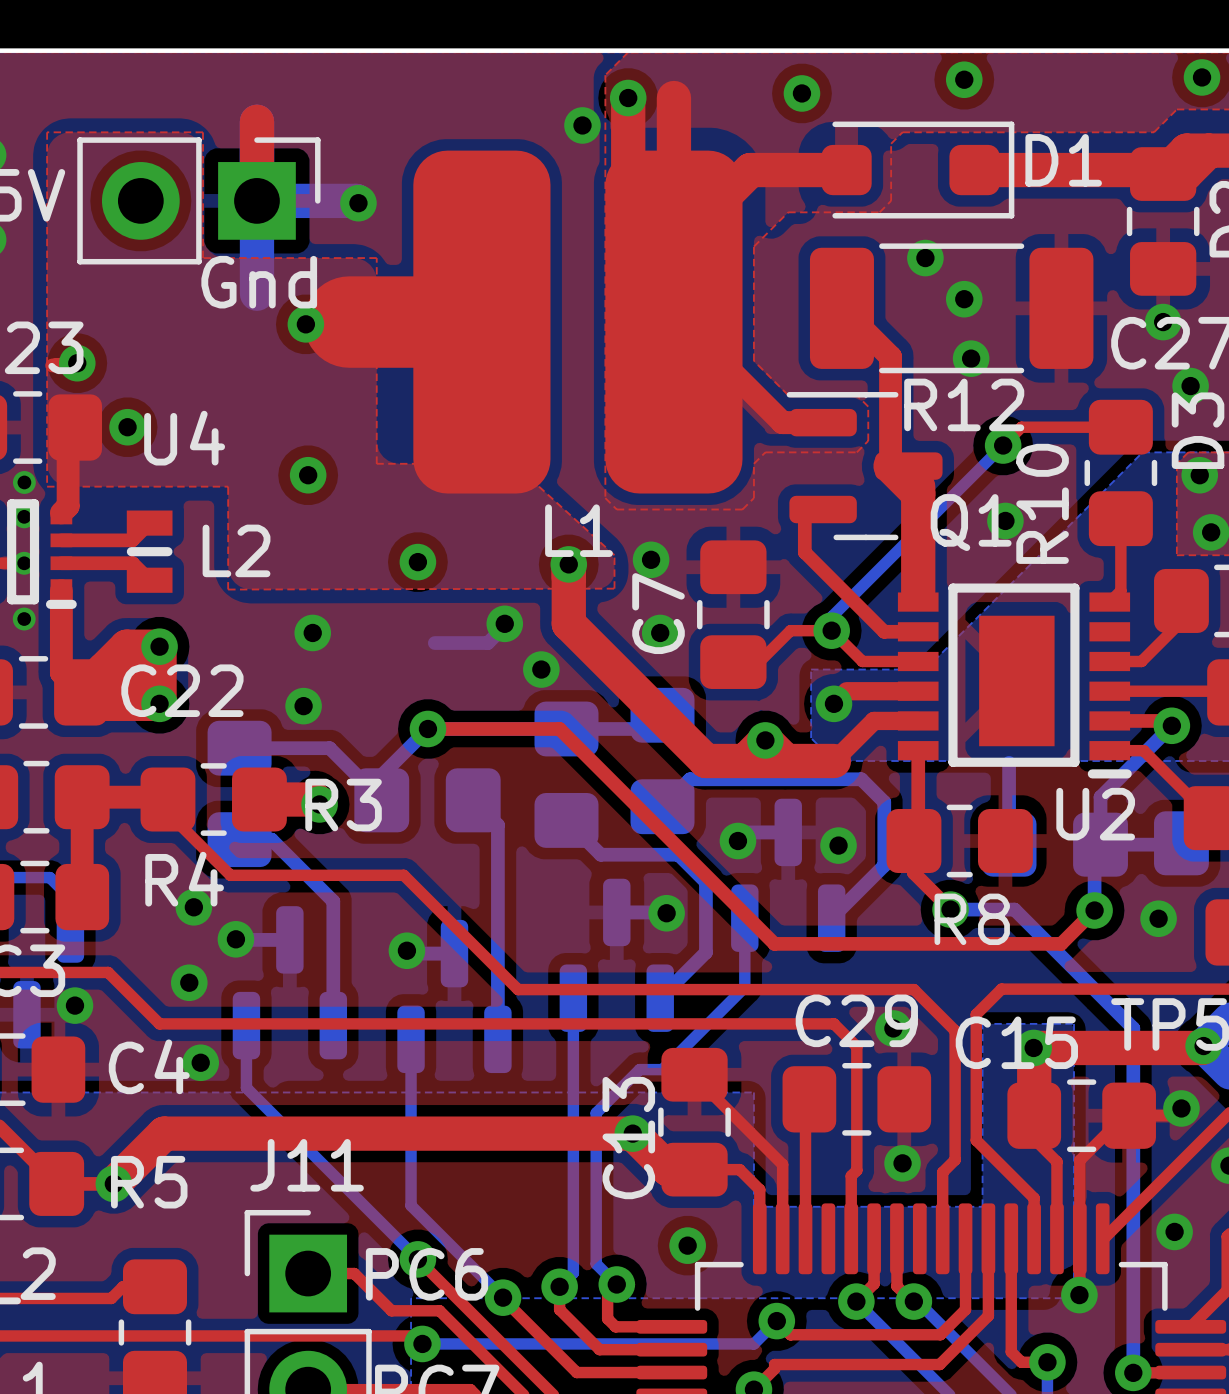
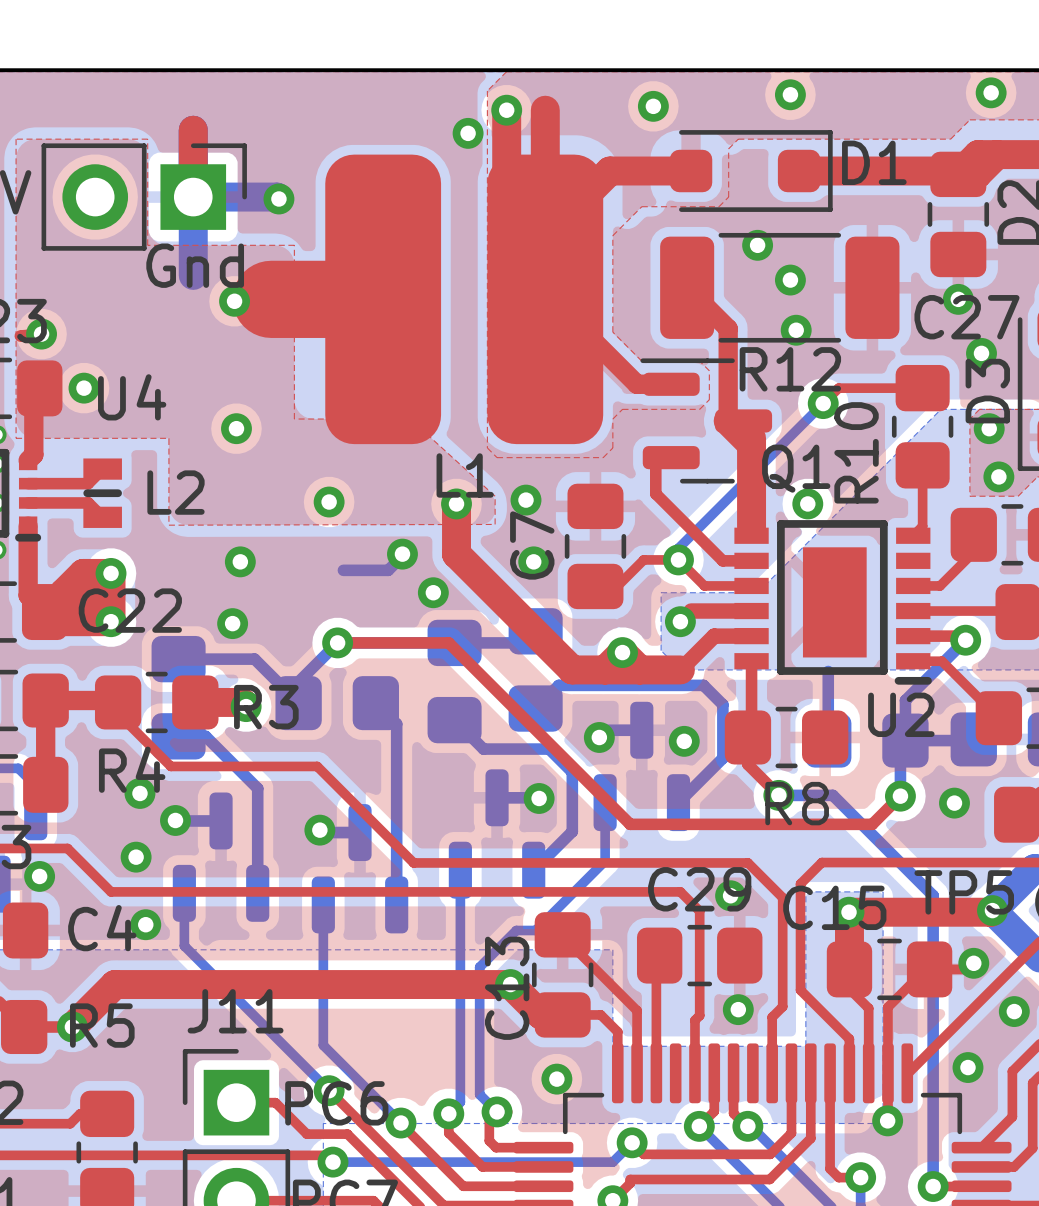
via position: (1005, 520) -> (807, 503)

